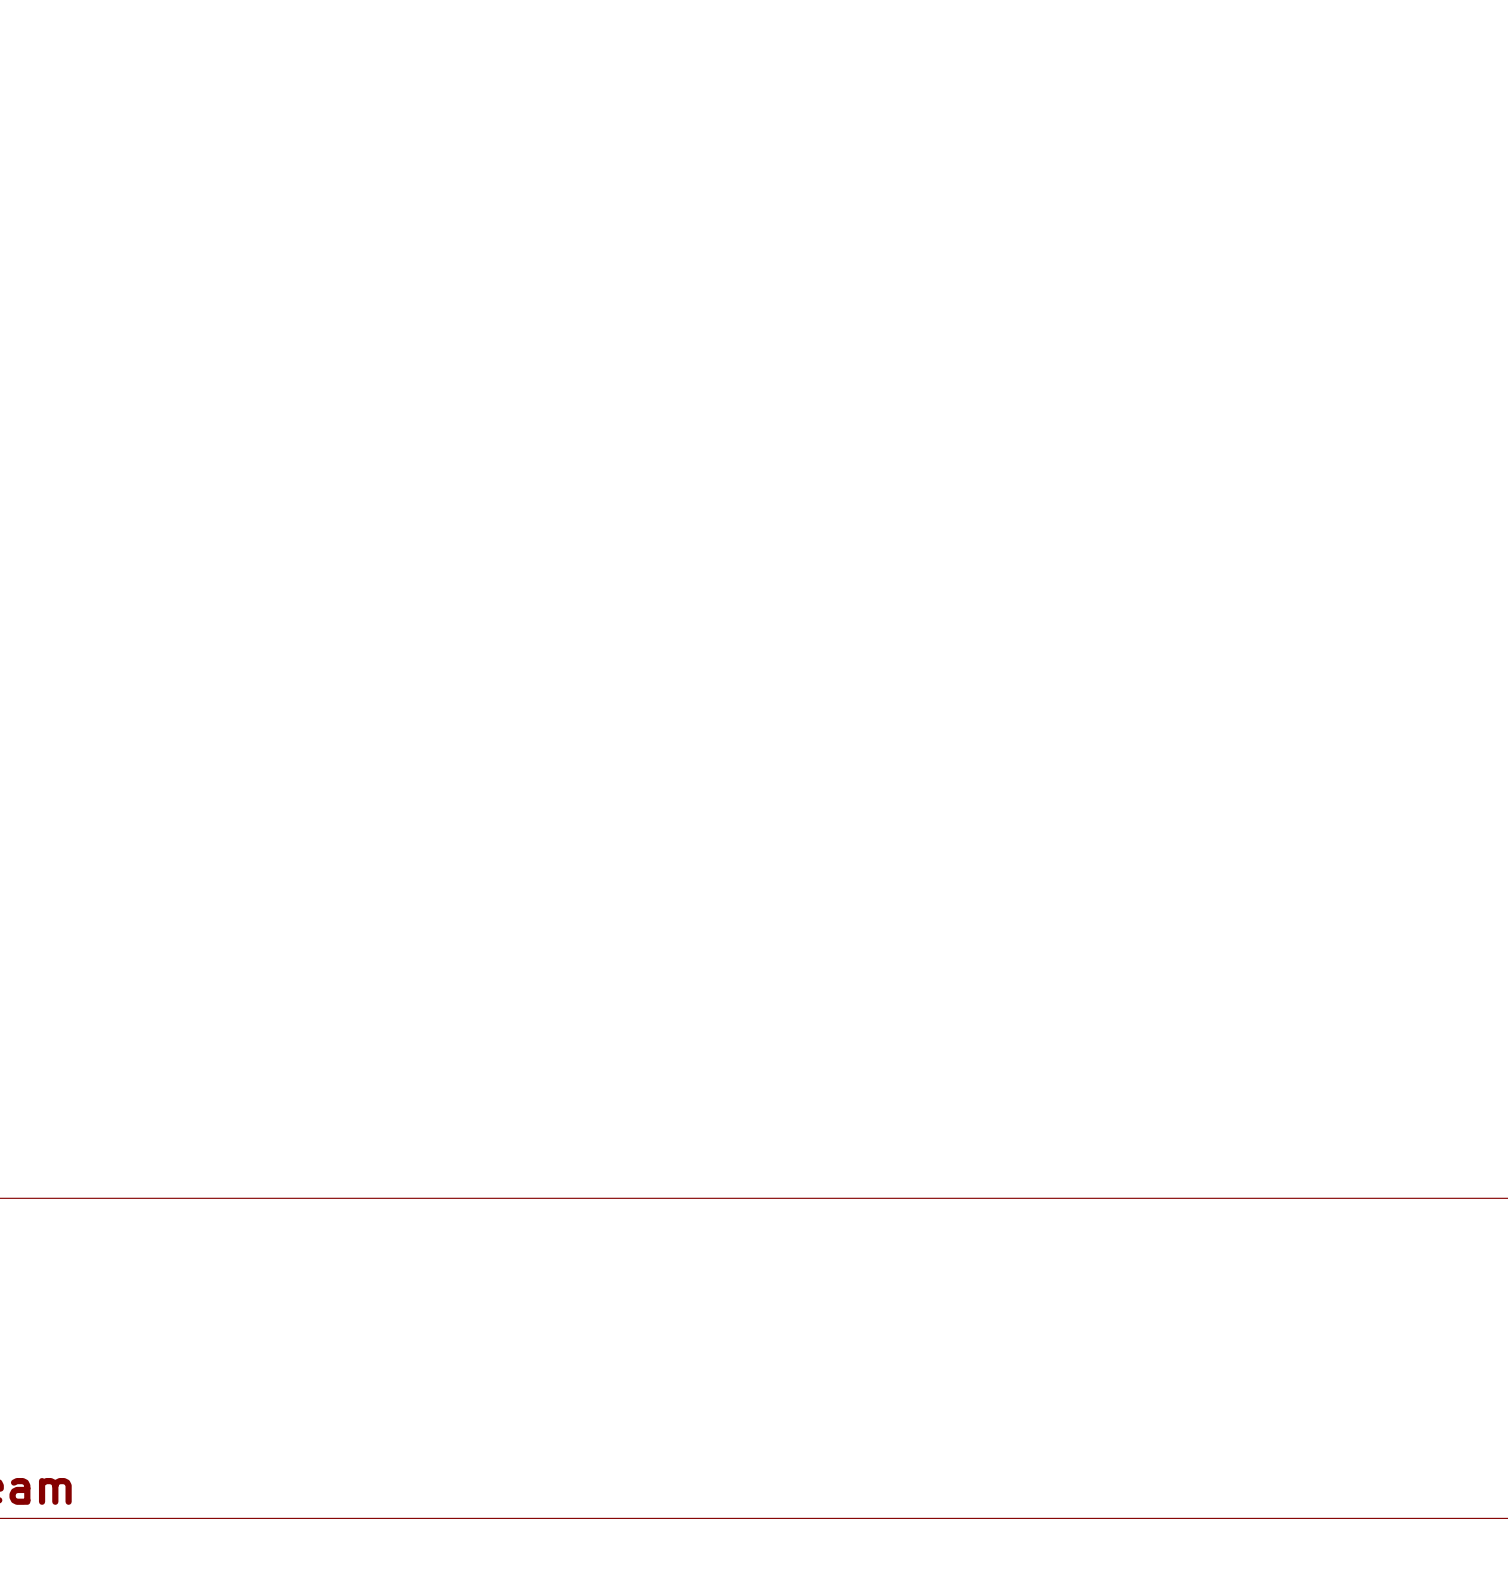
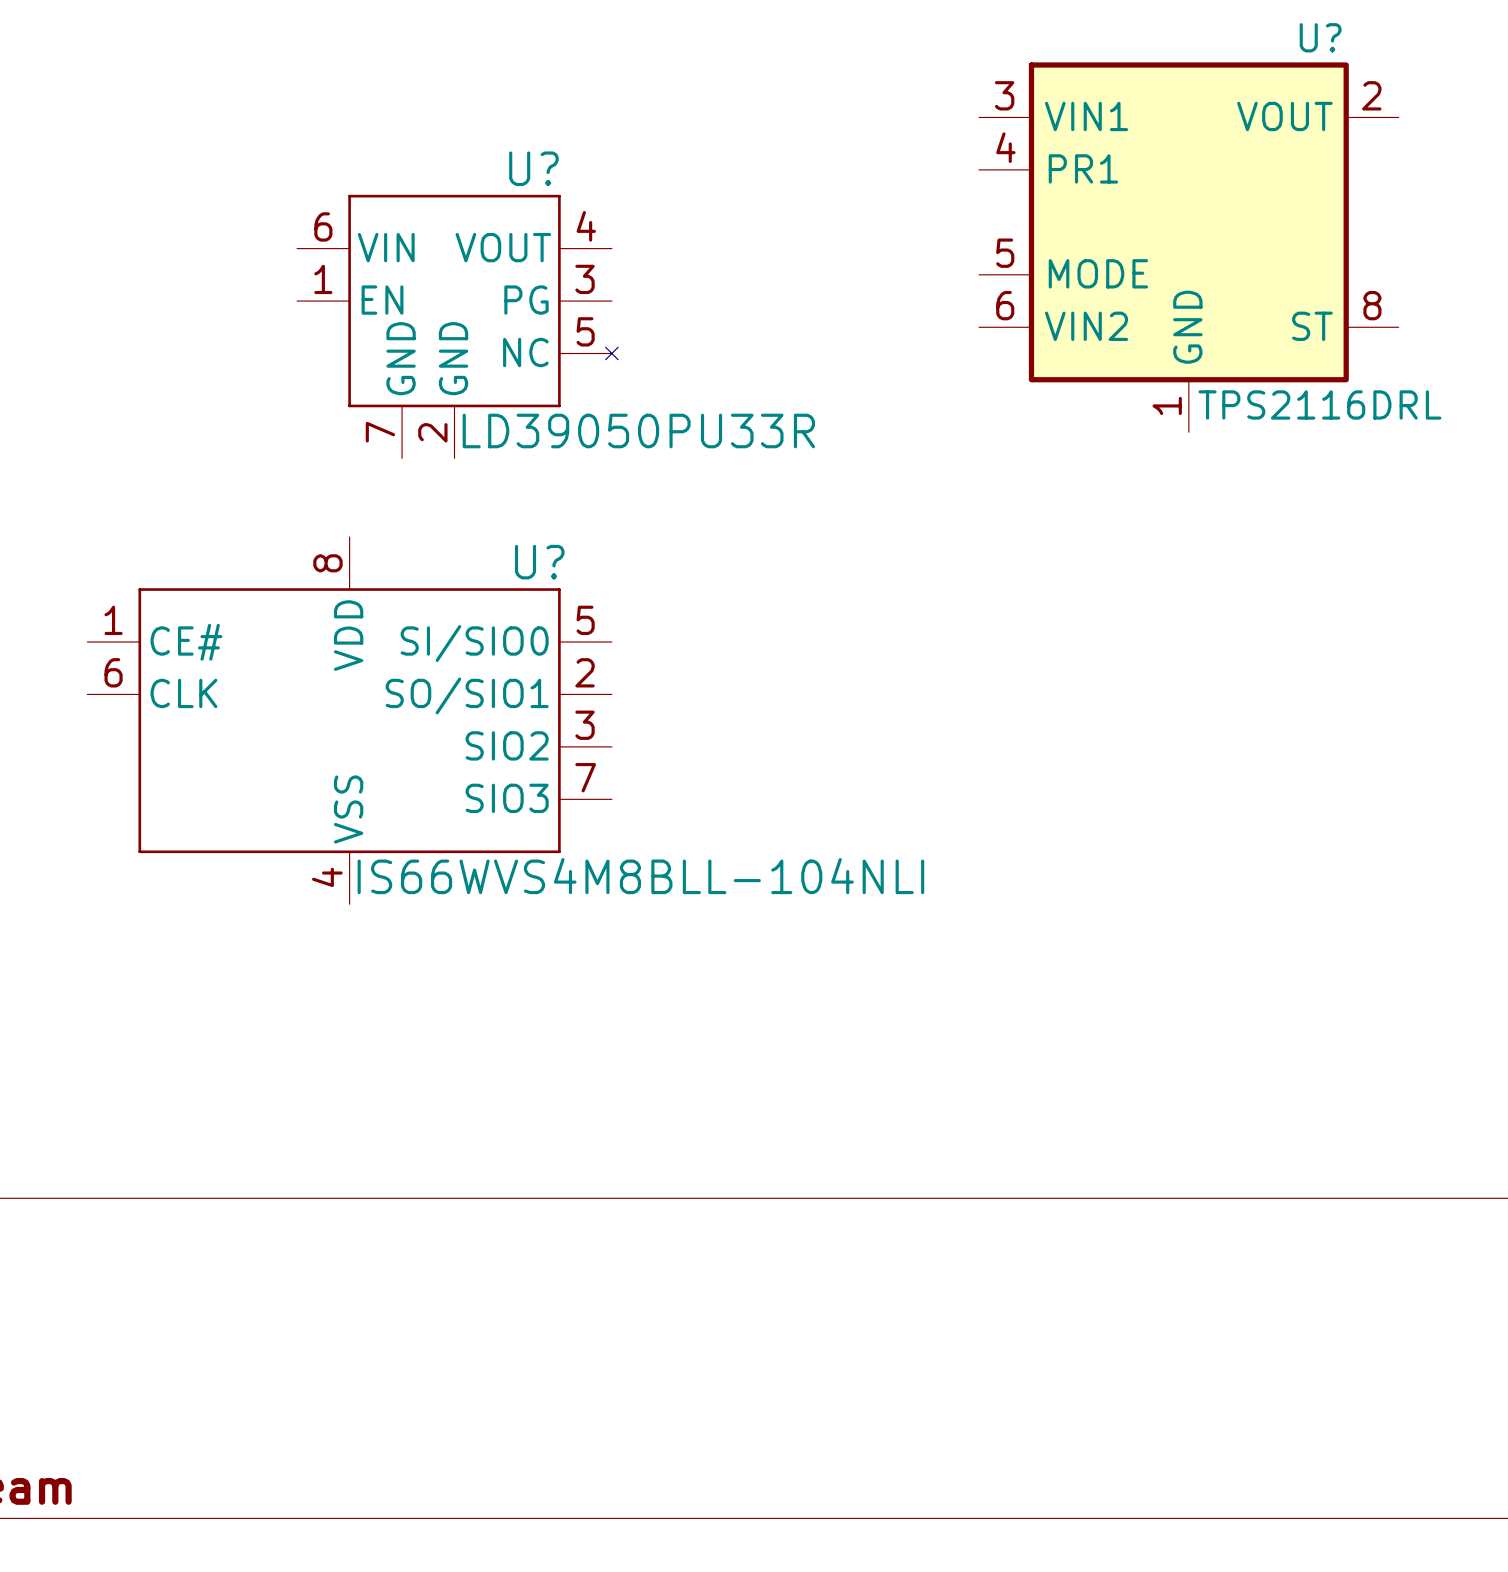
U?: none -> TPS2116DRL (1188, 247)
U?: none -> LD39050PU33R (457, 326)
U?: none -> IS66WVS4M8BLL-104NLI (349, 720)

